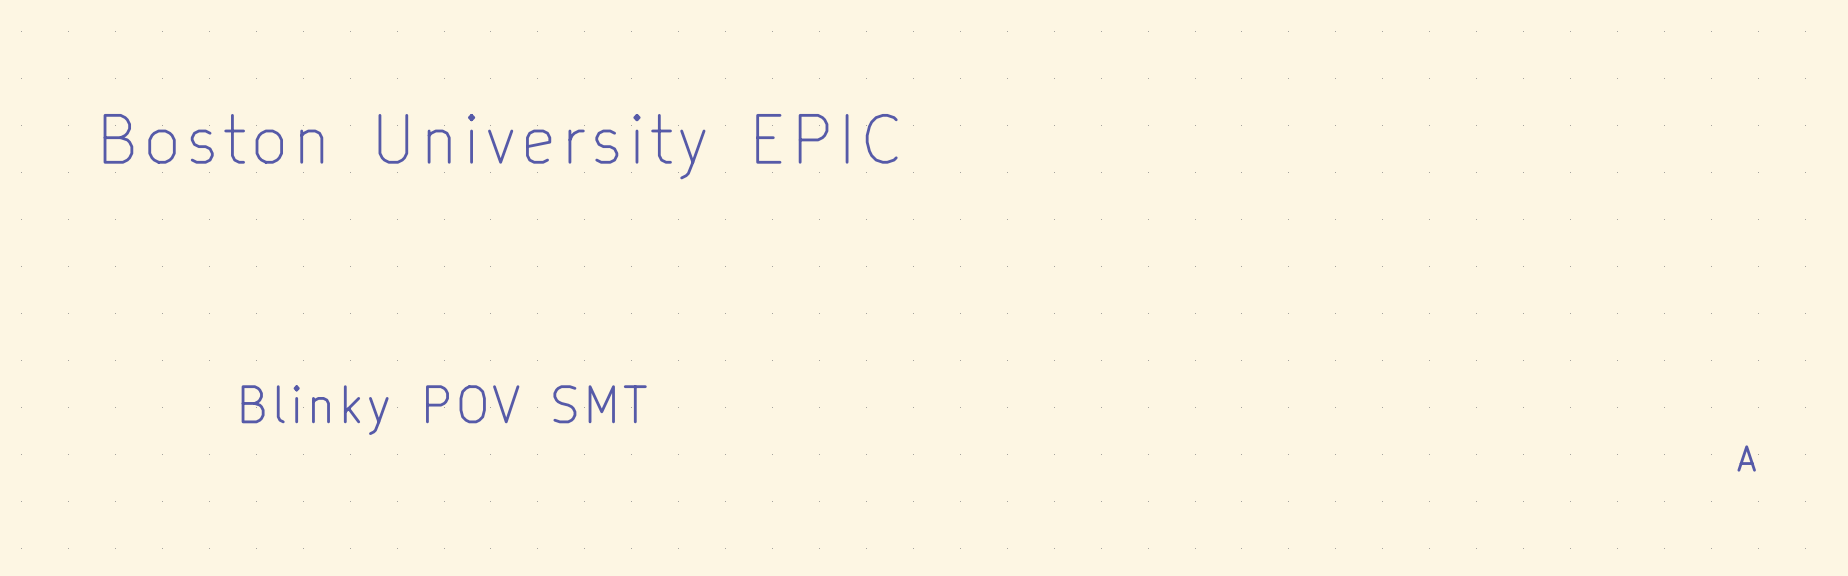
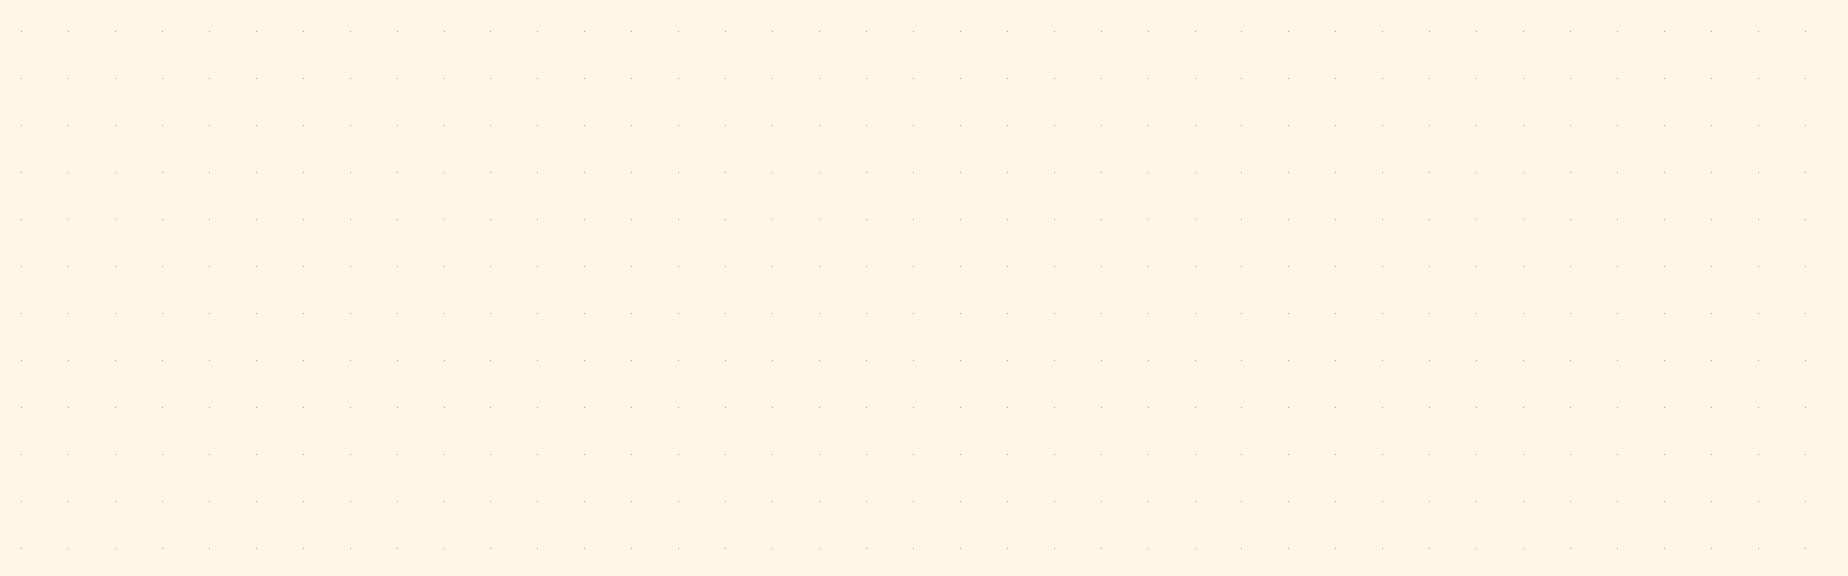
text: Boston University EPIC (500, 146) -> none
text: Blinky POV SMT (444, 410) -> none
text: A (1746, 458) -> none

